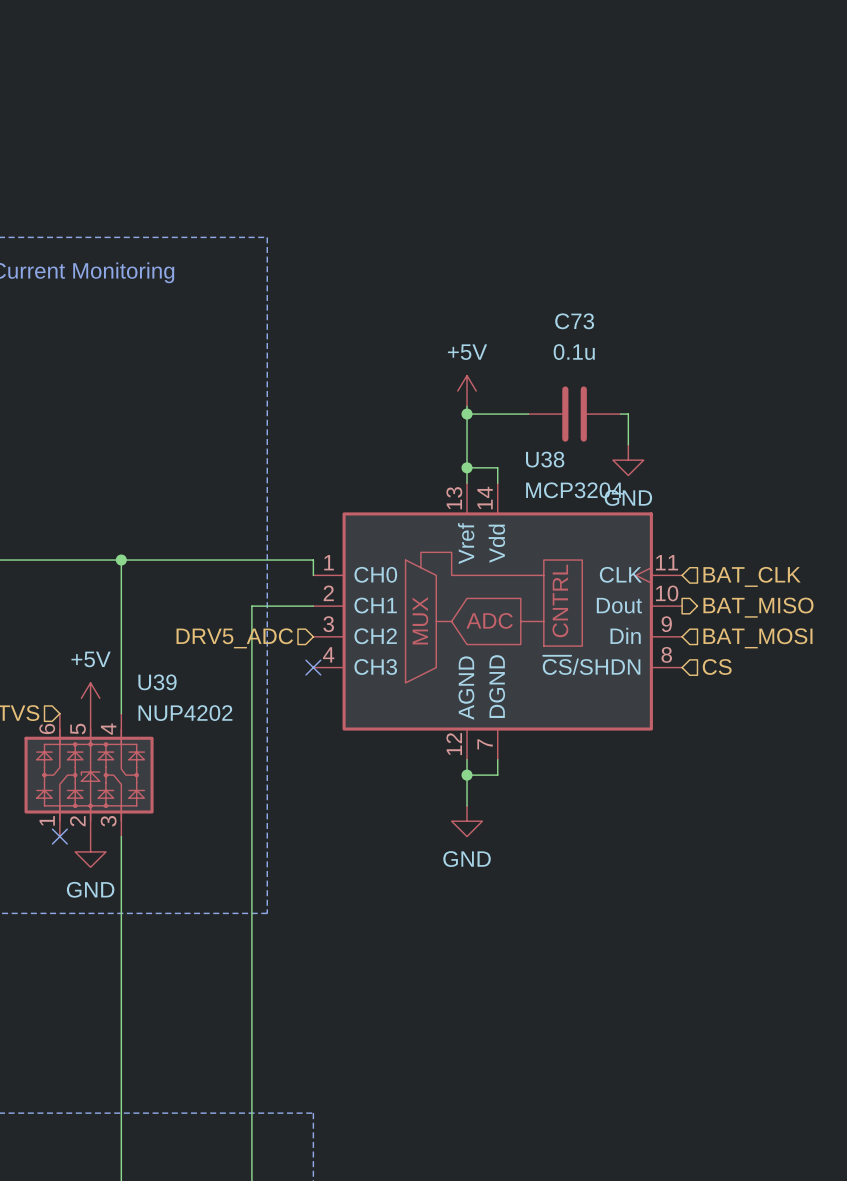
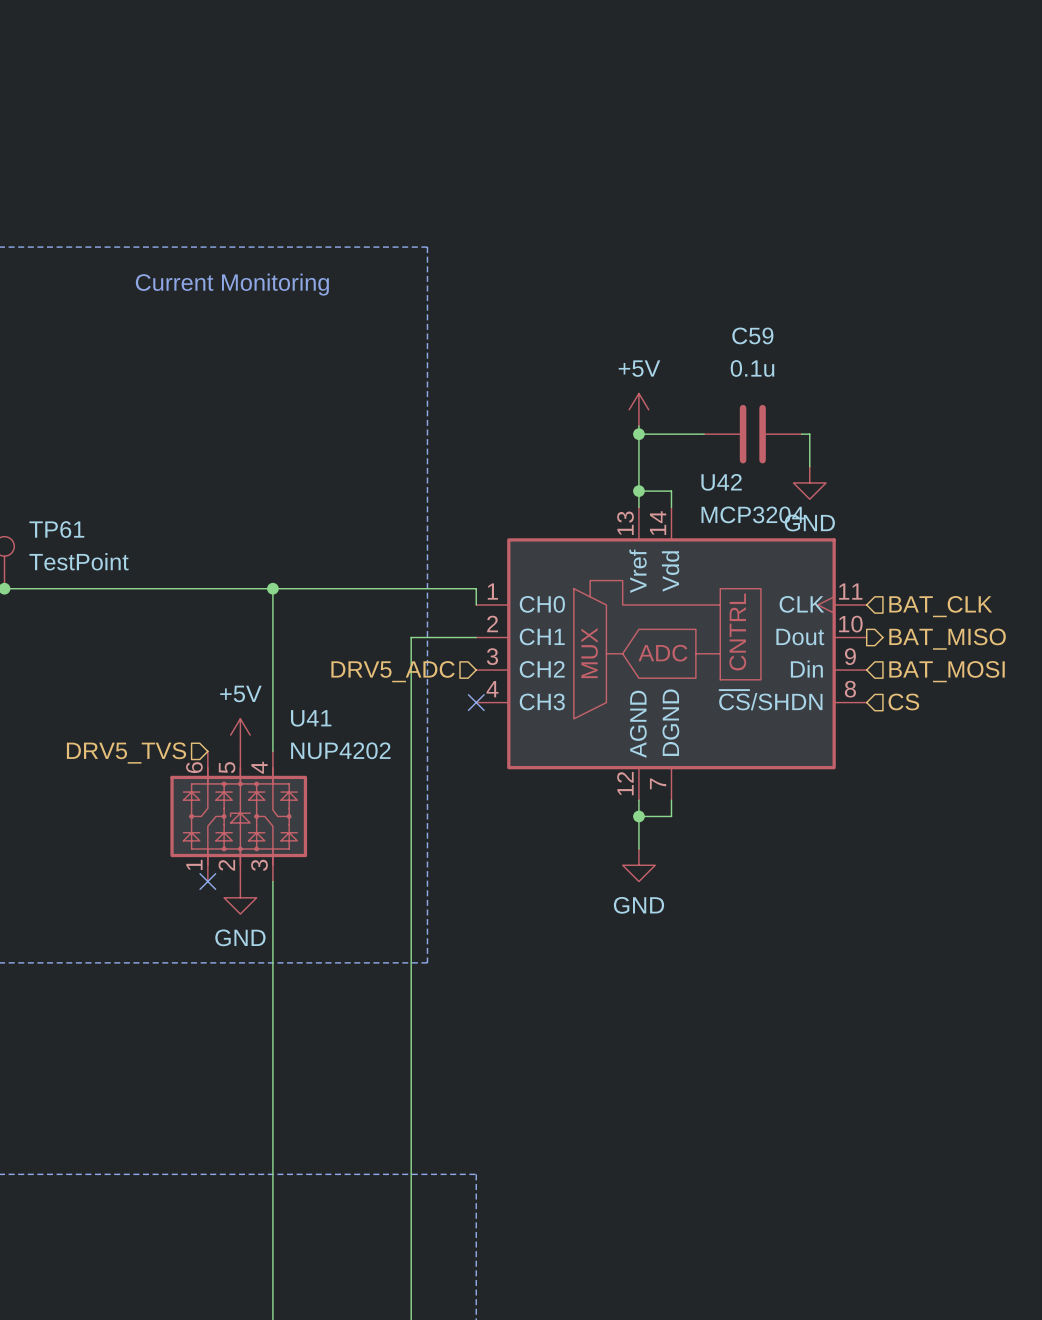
C73 name: C73 (574, 321) -> C59 (752, 335)
U38 name: U38 (545, 459) -> U42 (721, 482)
U39 name: U39 (157, 682) -> U41 (311, 718)

